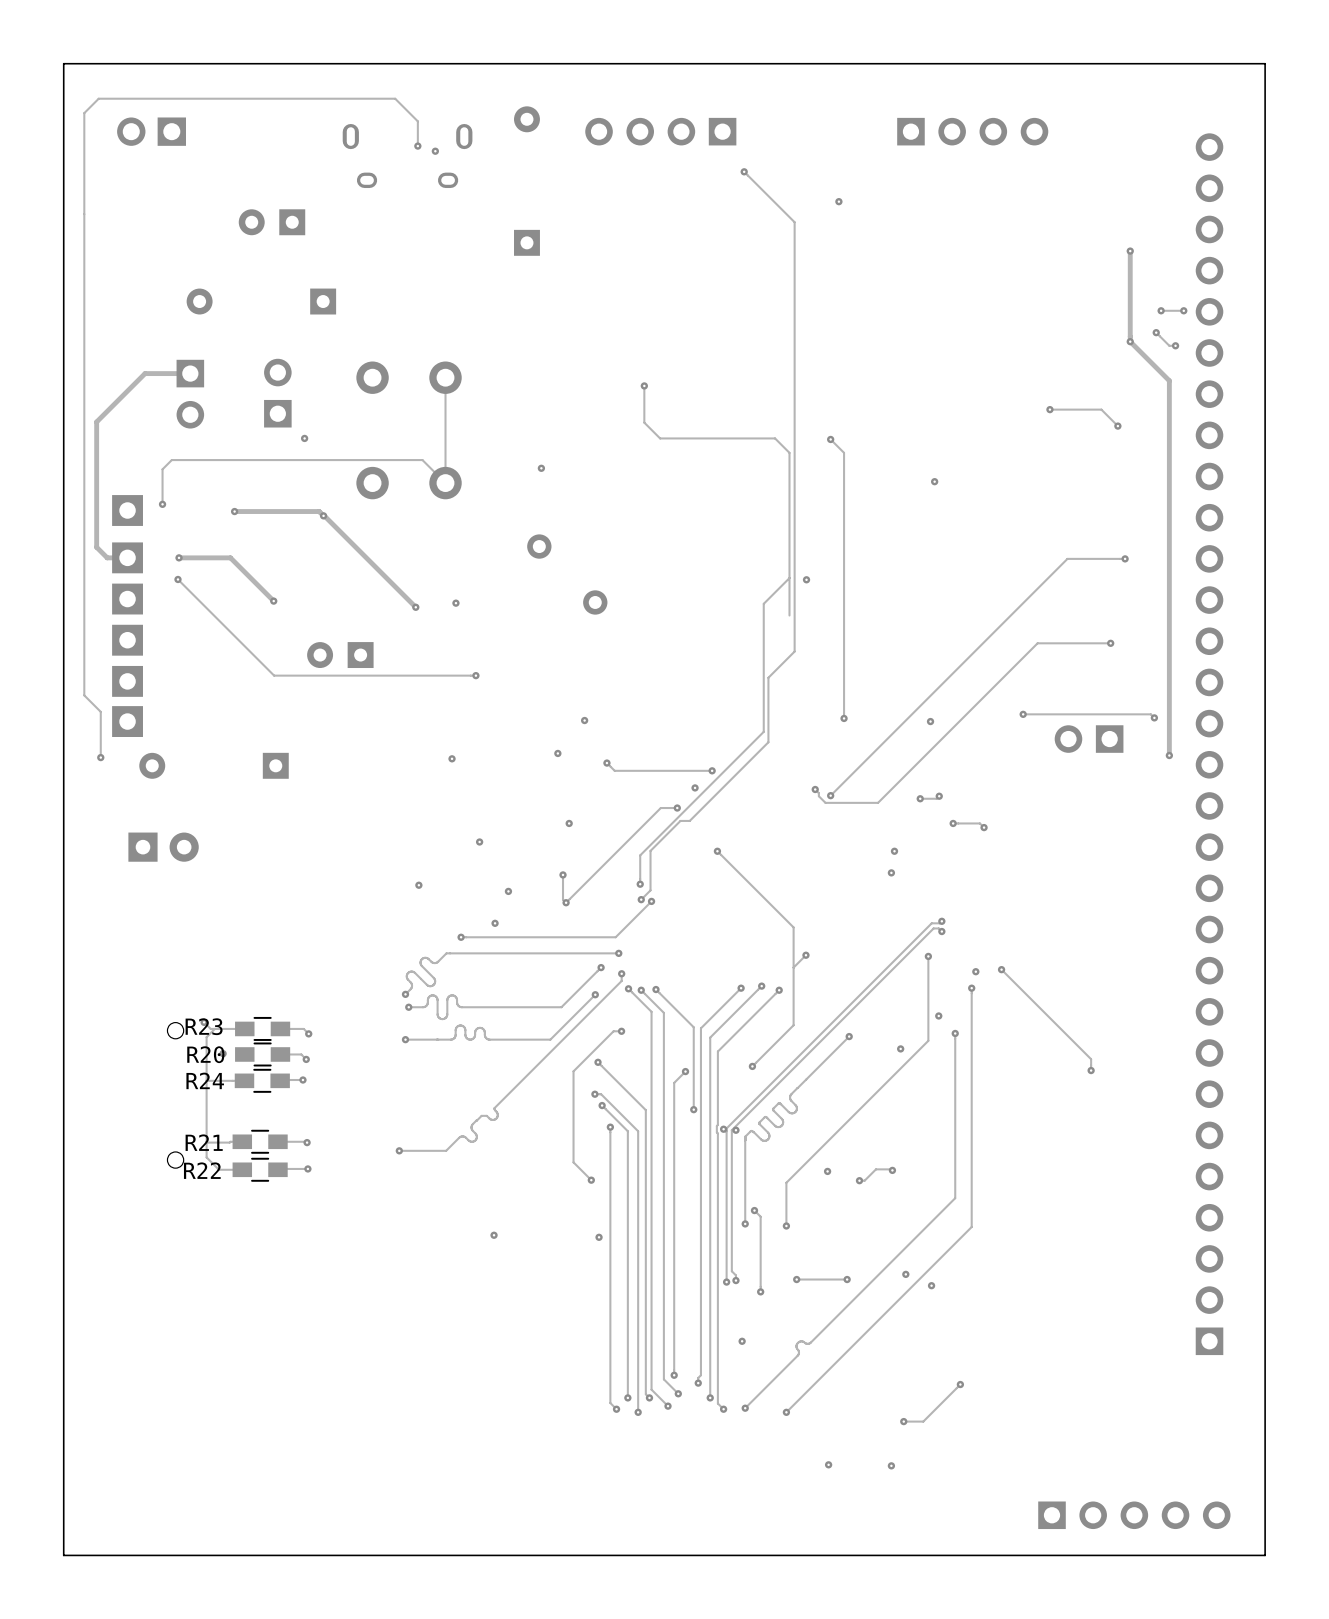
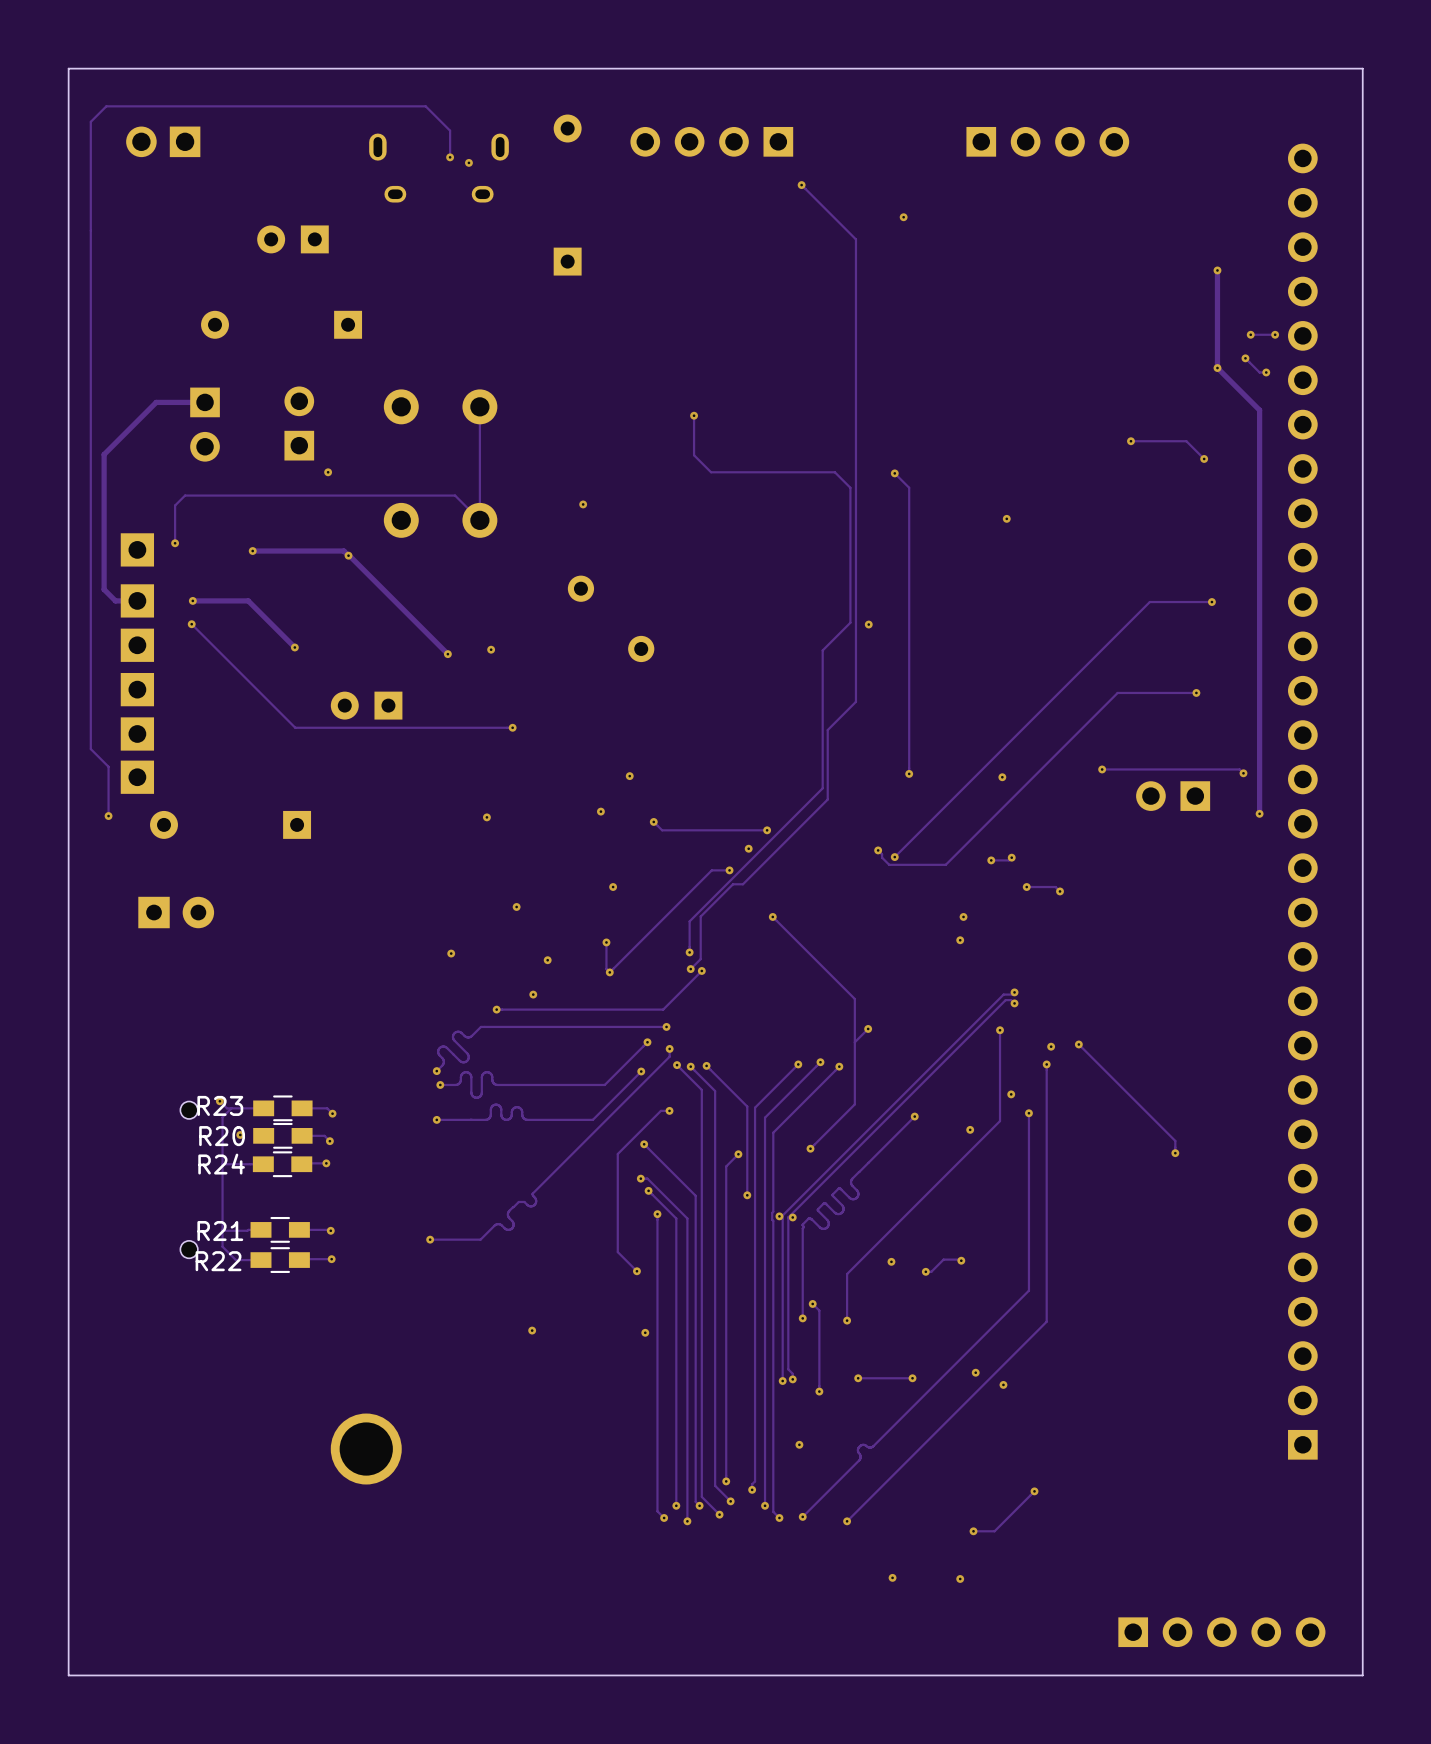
track: (789, 578) (789, 615) -> none
part: none -> (366, 1449)

